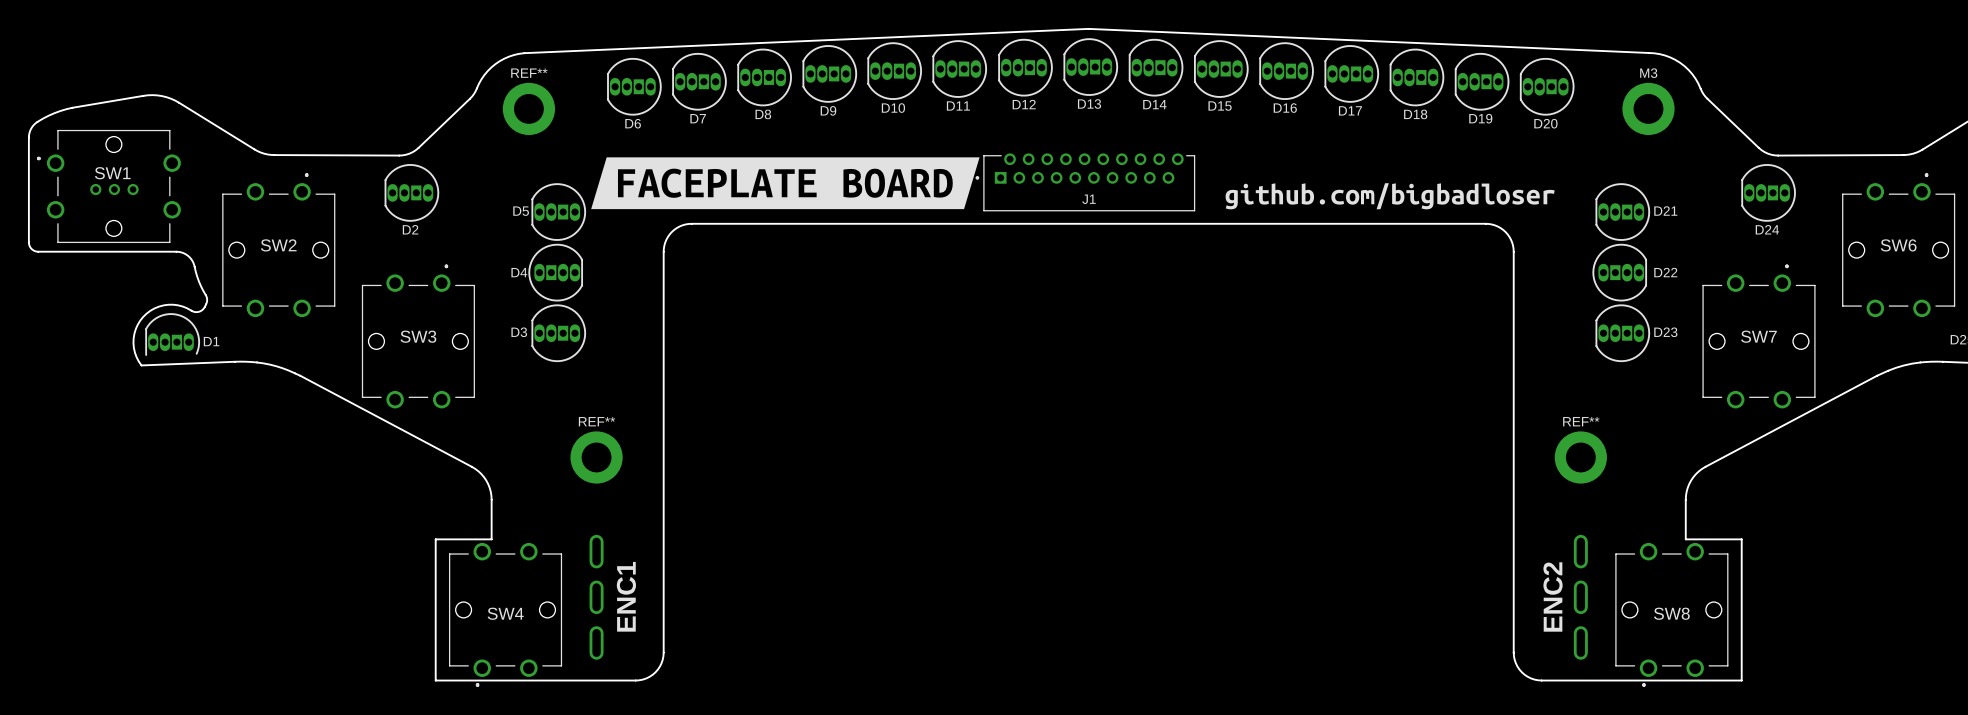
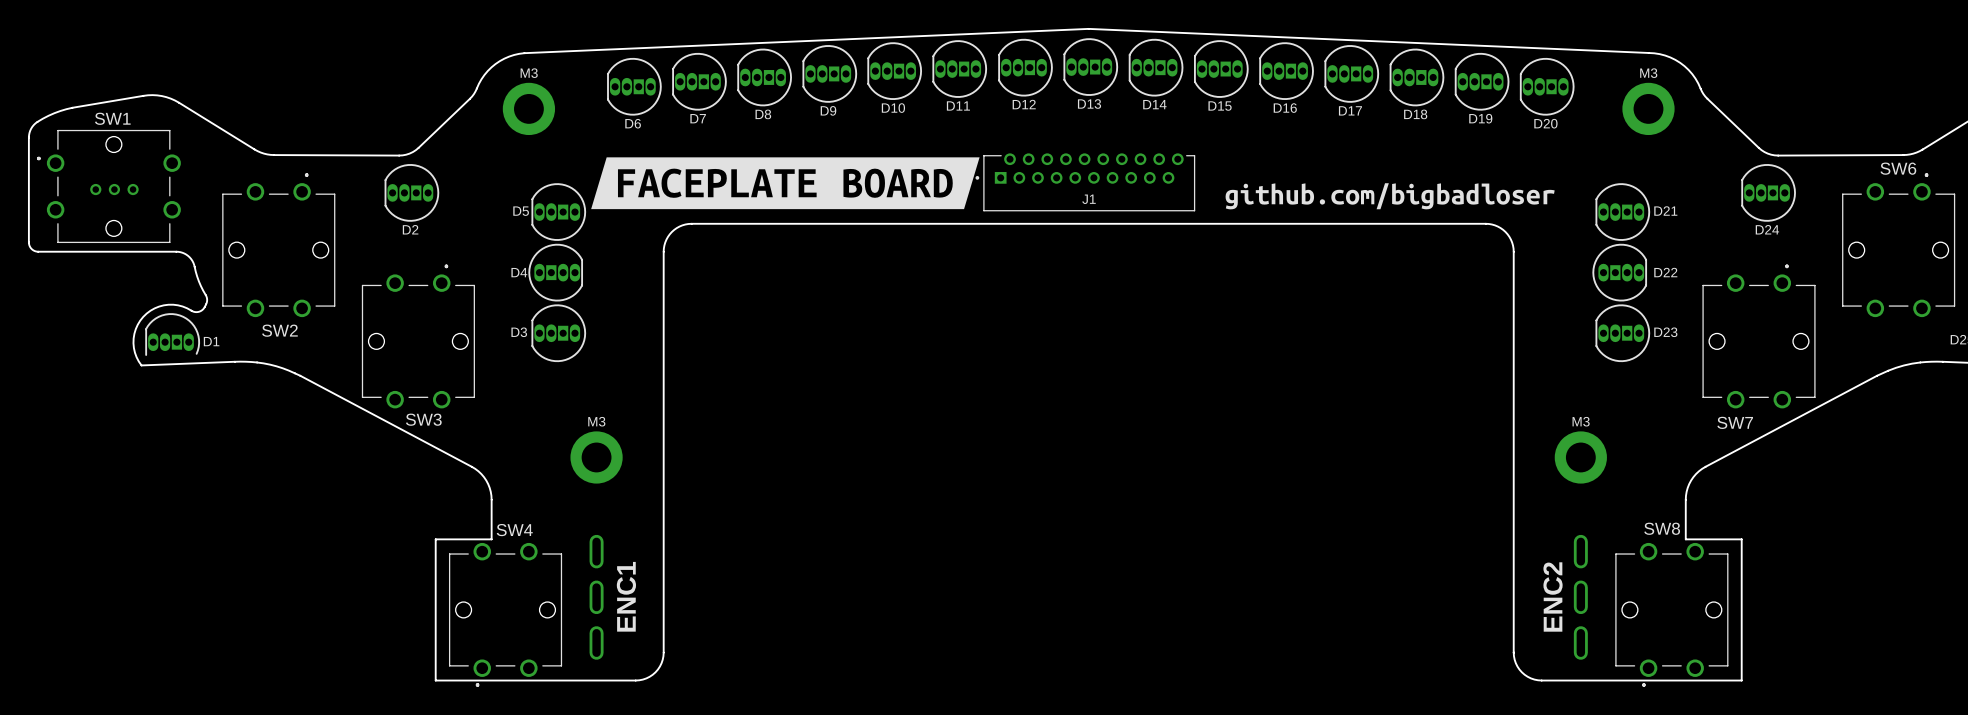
REF** name: REF** (529, 73) -> M3 (529, 73)
SW1 name position: SW1 (112, 173) -> SW1 (112, 118)
SW2 name position: SW2 (278, 245) -> SW2 (279, 330)
SW6 name position: SW6 (1898, 245) -> SW6 (1898, 168)
SW3 name position: SW3 (418, 336) -> SW3 (423, 419)
SW7 name position: SW7 (1758, 336) -> SW7 (1735, 422)
REF** name: REF** (597, 421) -> M3 (596, 421)
REF** name: REF** (1581, 421) -> M3 (1581, 421)
SW4 name position: SW4 (505, 613) -> SW4 (514, 530)
SW8 name position: SW8 (1671, 613) -> SW8 (1662, 528)

